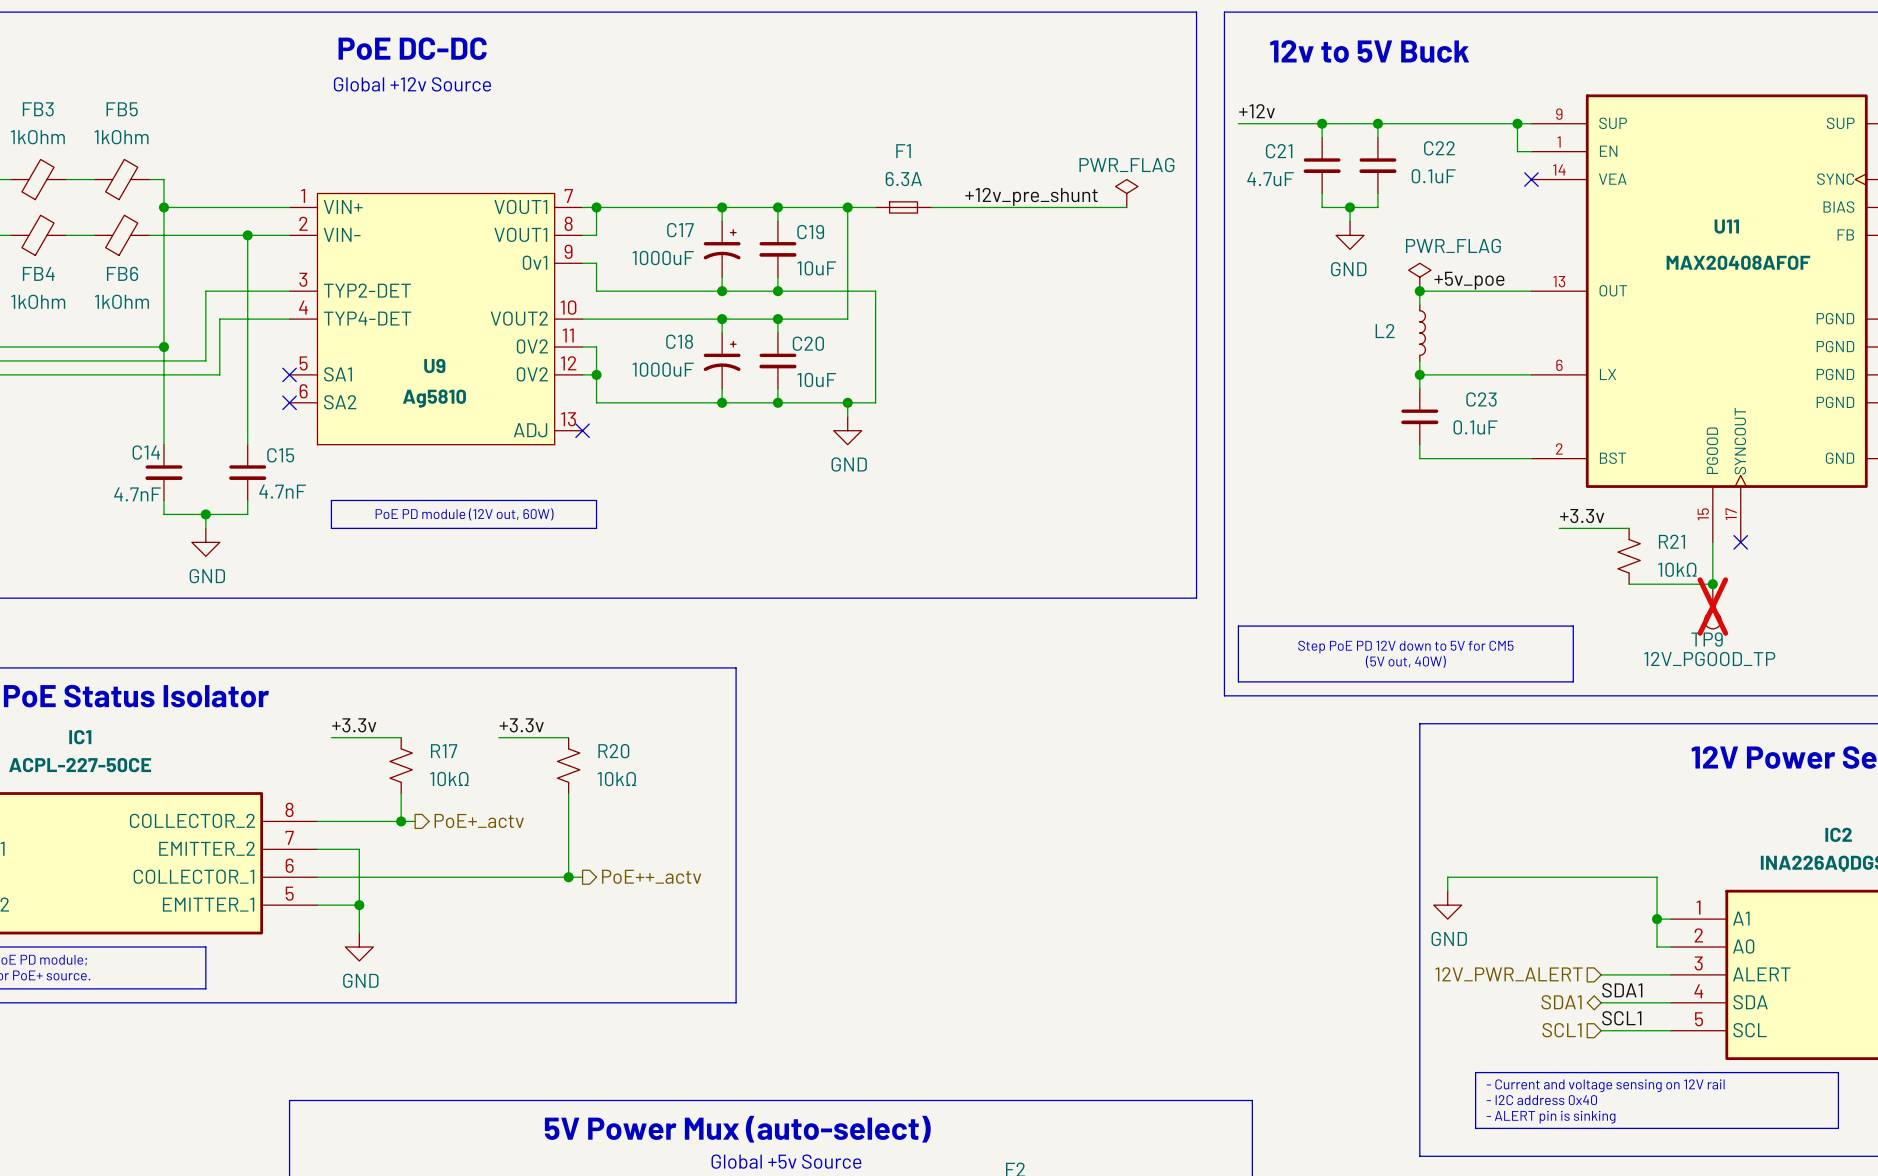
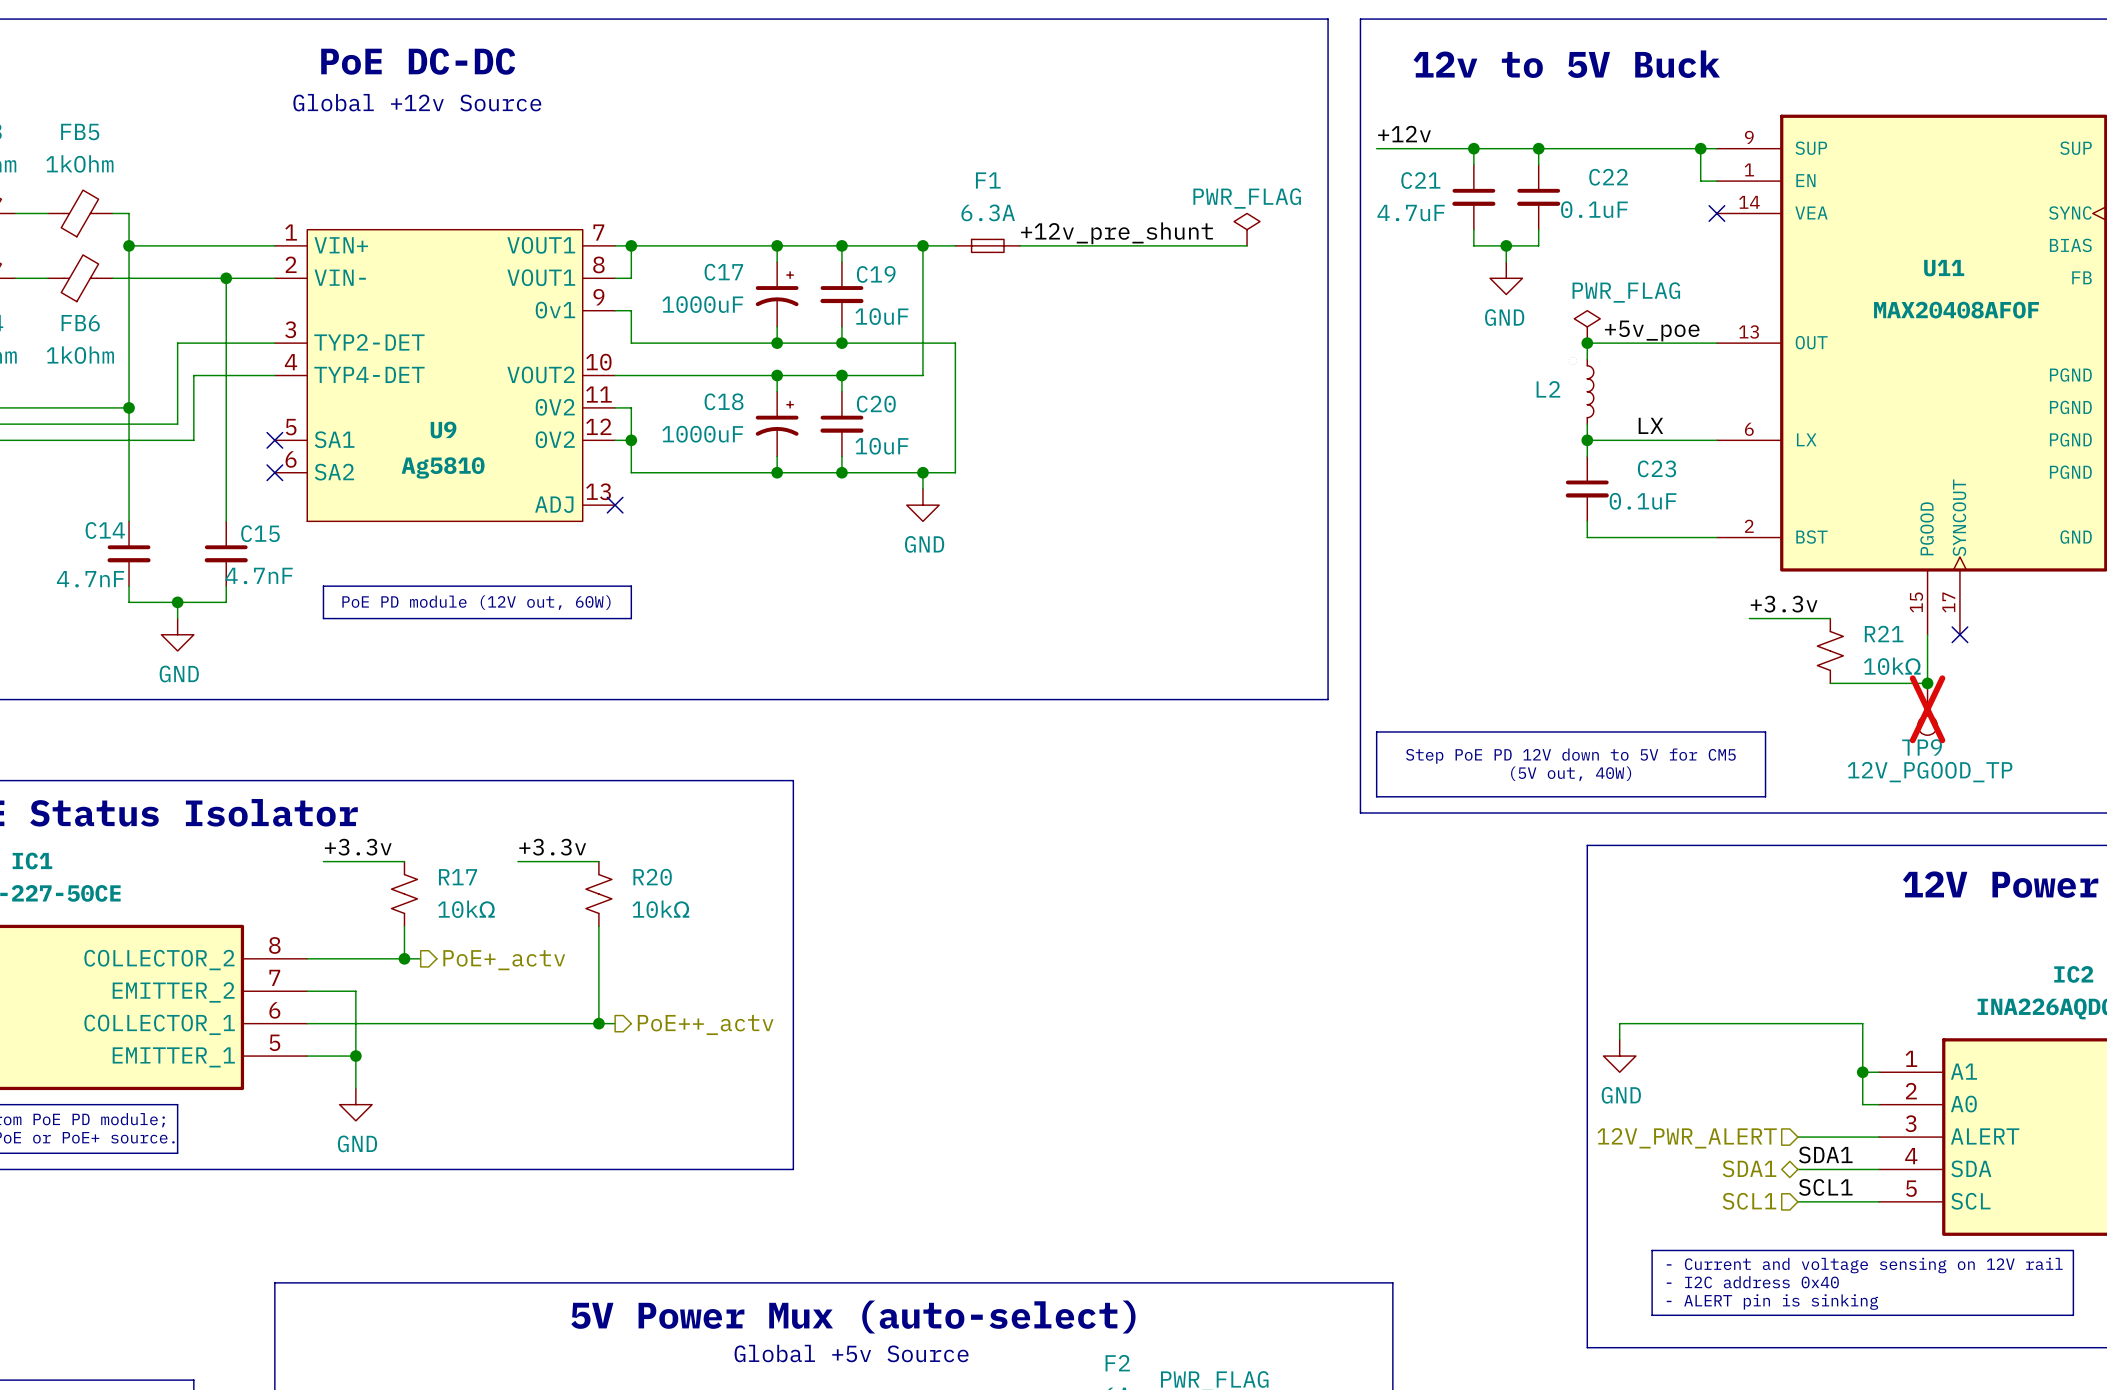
C21 value position: 4.7uF (1270, 179) -> 4.7uF (1411, 213)
label: none -> LX (1650, 425)

